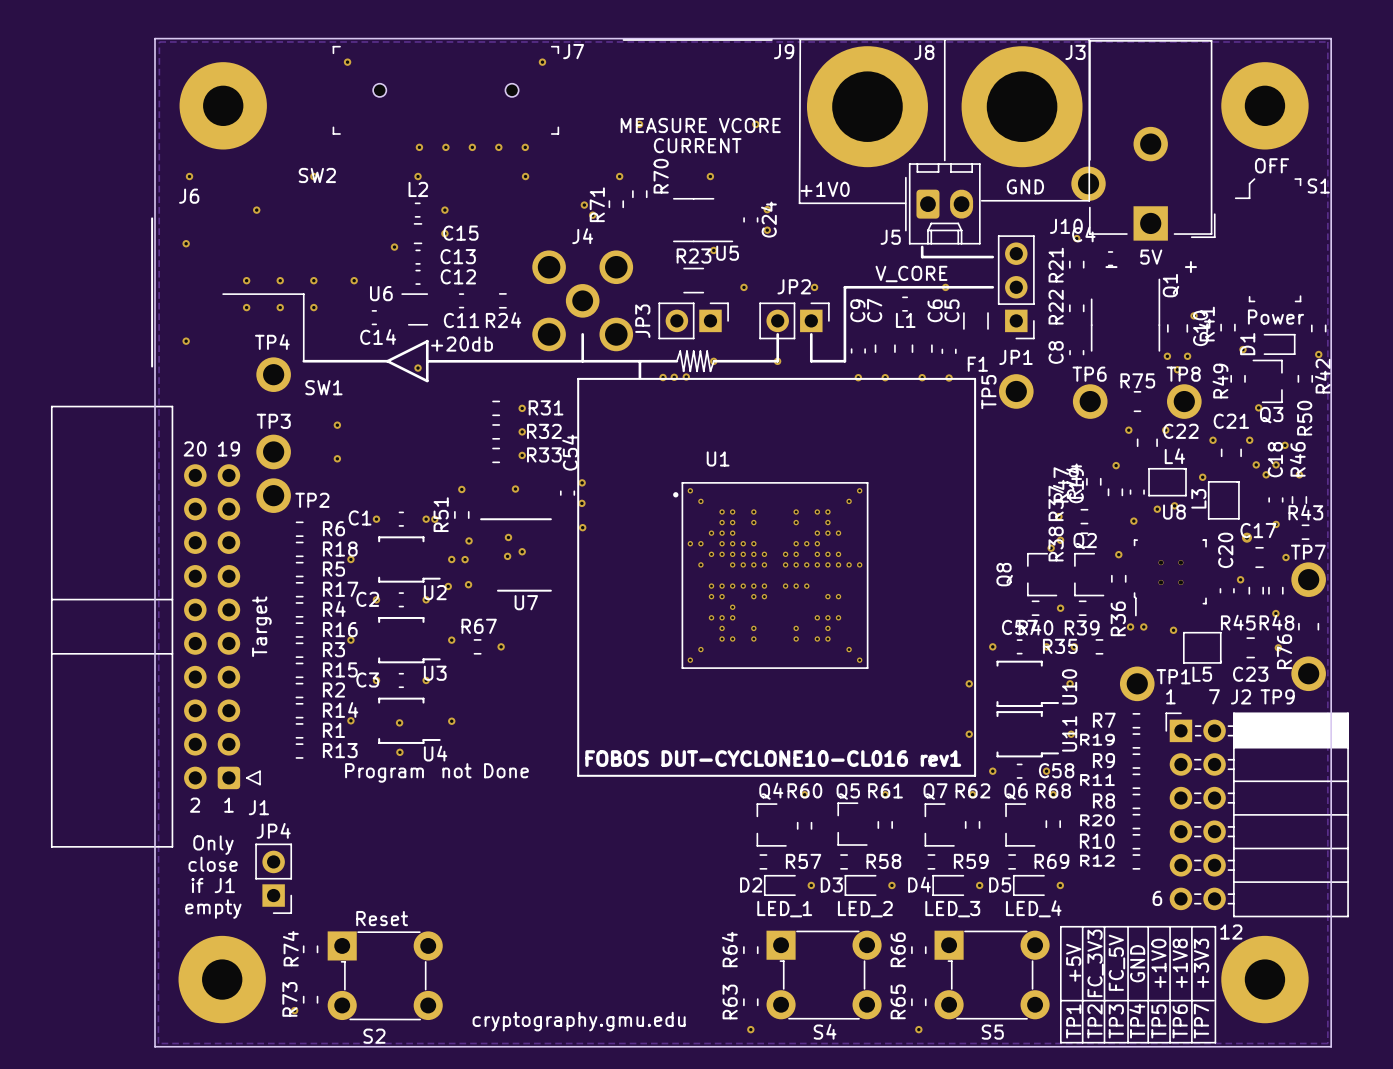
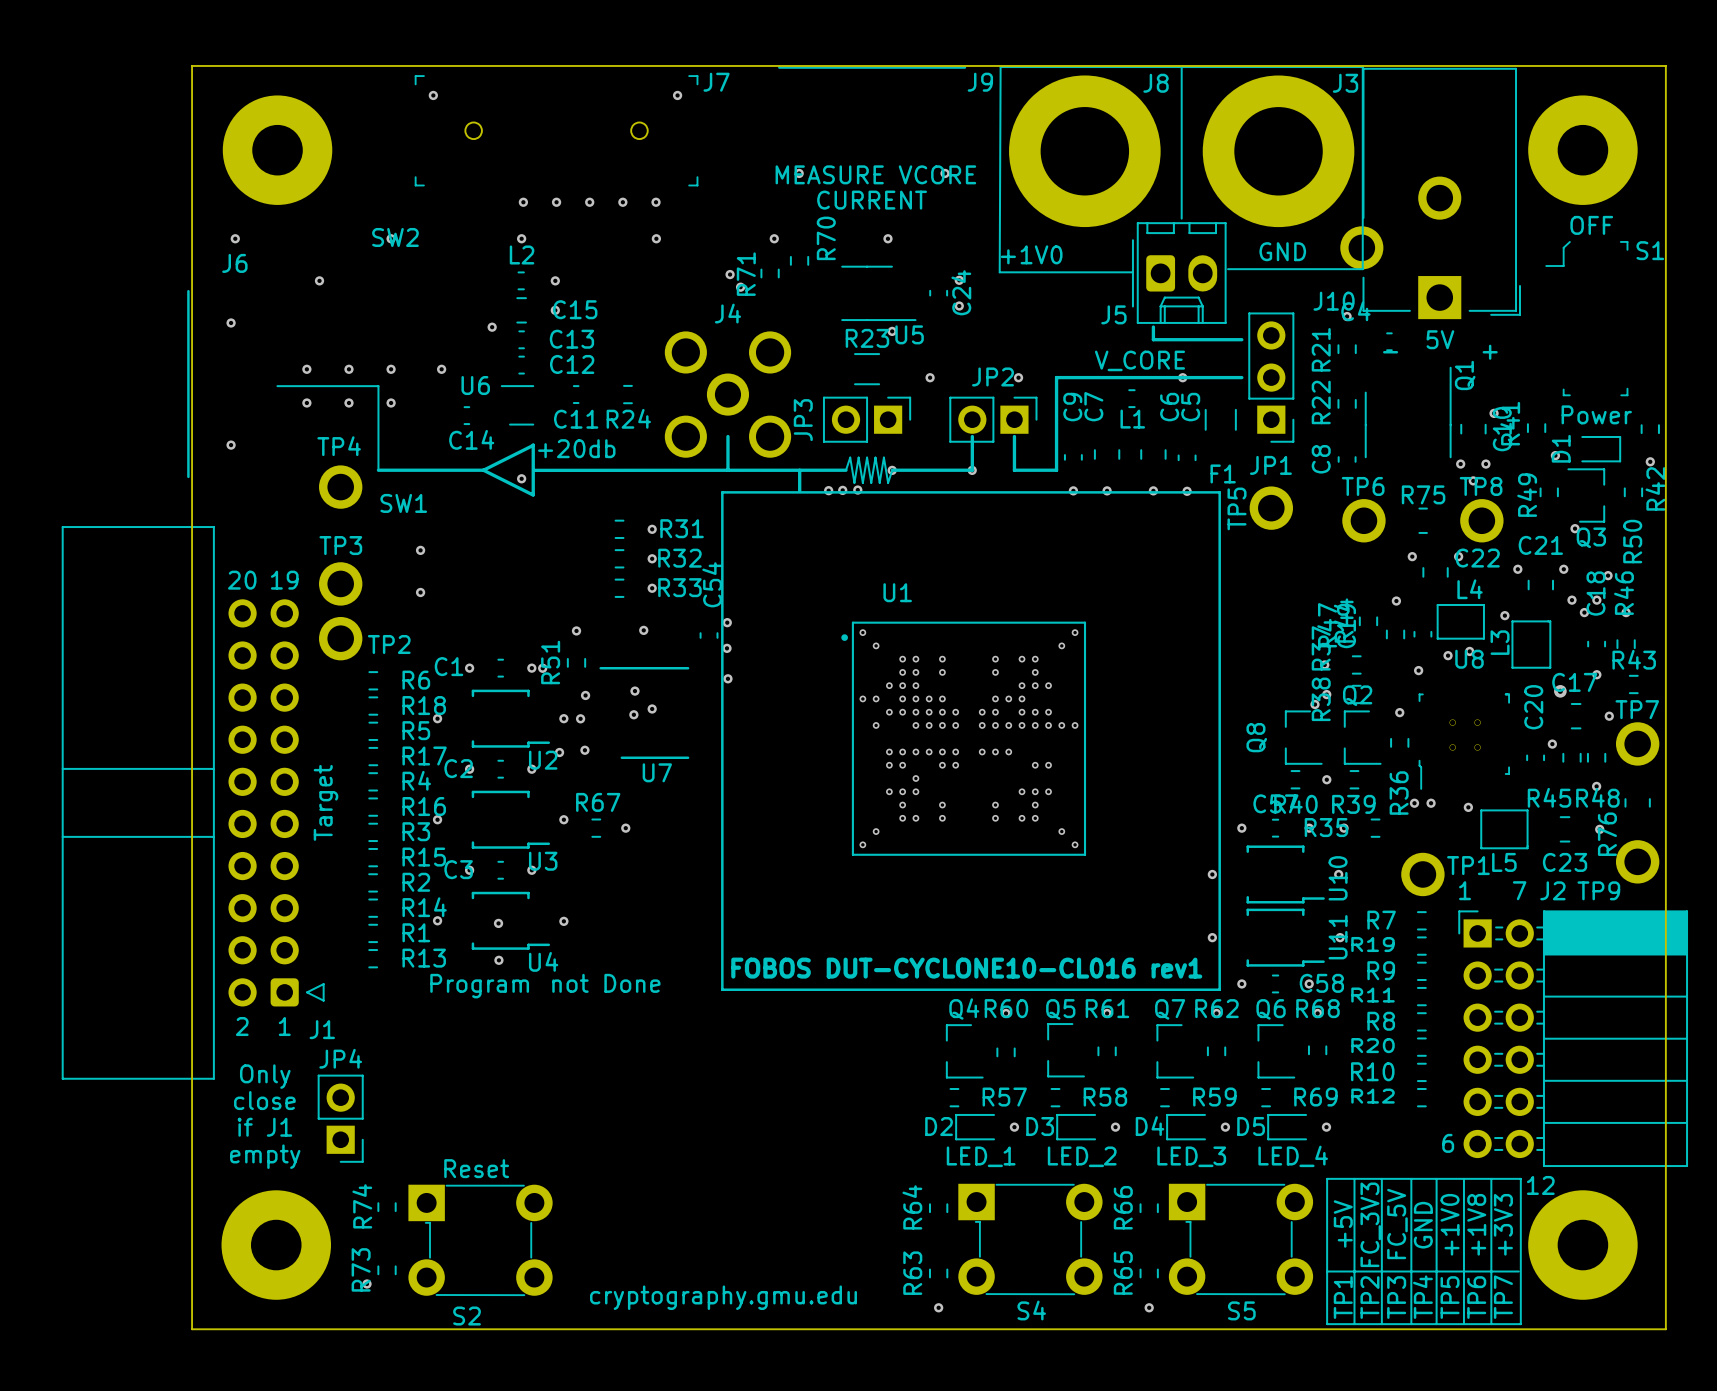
zone outline: (159, 41) (158, 1043) (1327, 1043) (1327, 41) (159, 41) -> none

